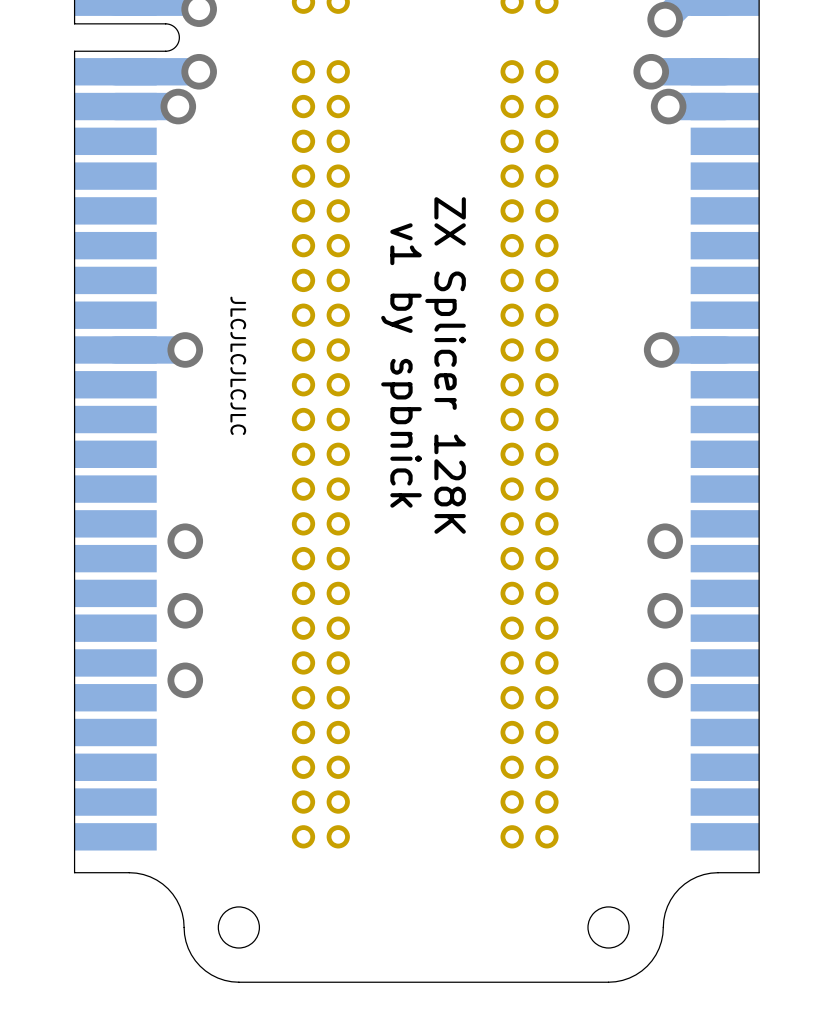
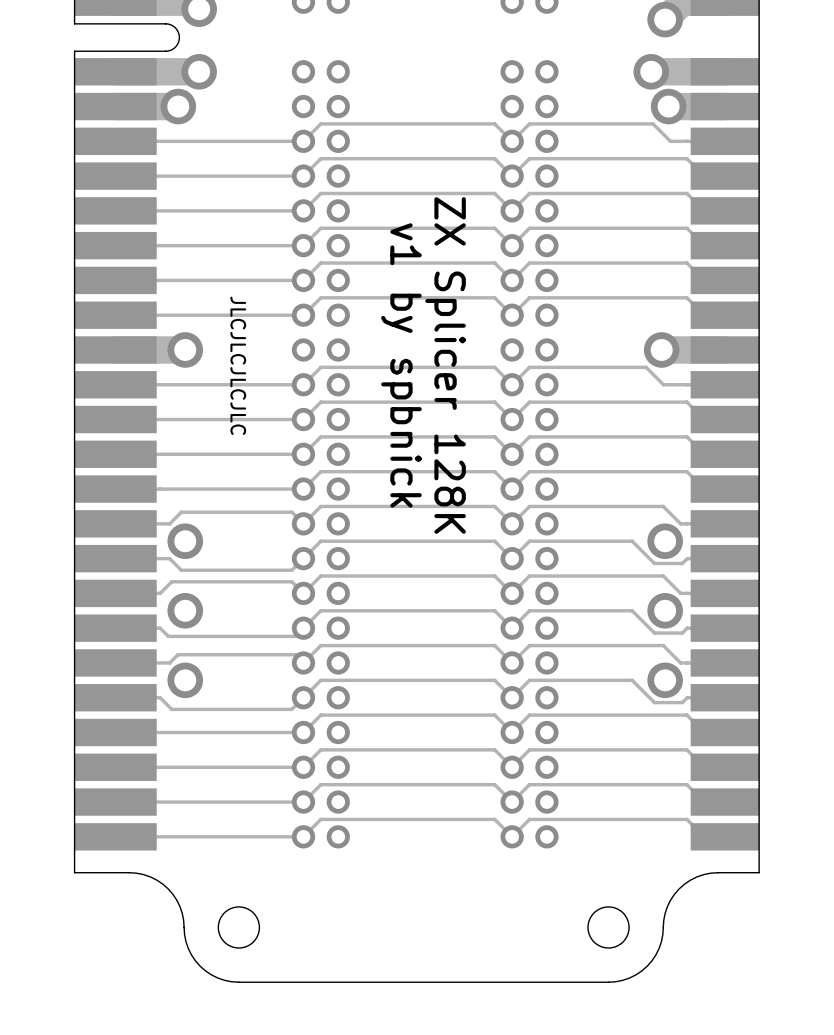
track: none -> (724, 141) (670, 141) (653, 123) (529, 123) (512, 141) (494, 123) (320, 123) (303, 141) (115, 141)
track: none -> (724, 176) (704, 176) (686, 158) (529, 158) (512, 176) (494, 158) (320, 158) (303, 176) (115, 176)
track: none -> (724, 210) (704, 210) (686, 193) (529, 193) (512, 210) (494, 193) (320, 193) (303, 210) (115, 210)
track: none -> (724, 245) (704, 245) (686, 228) (529, 228) (512, 245) (494, 228) (320, 228) (303, 245) (115, 245)
track: none -> (724, 280) (704, 280) (686, 263) (529, 263) (512, 280) (494, 263) (320, 263) (303, 280) (115, 280)
track: none -> (724, 315) (704, 315) (686, 297) (529, 297) (512, 315) (494, 297) (320, 297) (303, 315) (115, 315)
track: none -> (724, 384) (663, 384) (646, 367) (529, 367) (512, 384) (494, 367) (320, 367) (303, 384) (115, 384)
track: none -> (724, 419) (704, 419) (686, 402) (529, 402) (512, 419) (494, 402) (320, 402) (303, 419) (115, 419)
track: none -> (724, 454) (704, 454) (686, 436) (529, 436) (512, 454) (494, 436) (320, 436) (303, 454) (115, 454)
track: none -> (724, 489) (704, 489) (686, 471) (529, 471) (512, 489) (494, 471) (320, 471) (303, 489) (115, 489)
track: none -> (724, 523) (680, 523) (663, 506) (529, 506) (512, 523) (494, 506) (320, 506) (303, 523) (291, 512) (181, 512) (169, 523) (115, 523)
track: none -> (724, 558) (687, 558) (682, 563) (654, 563) (632, 541) (529, 541) (512, 558) (494, 541) (320, 541) (291, 570) (181, 570) (169, 558) (115, 558)
track: none -> (724, 593) (680, 593) (663, 576) (529, 576) (512, 593) (494, 576) (320, 576) (303, 593) (291, 581) (171, 581) (160, 593) (115, 593)
track: none -> (724, 628) (687, 628) (682, 633) (654, 633) (632, 610) (529, 610) (512, 628) (494, 610) (320, 610) (295, 636) (168, 636) (160, 628) (115, 628)
track: none -> (724, 662) (680, 662) (663, 645) (529, 645) (512, 662) (494, 645) (320, 645) (303, 662) (295, 654) (177, 654) (169, 662) (115, 662)
track: none -> (724, 697) (687, 697) (682, 702) (654, 702) (632, 680) (529, 680) (512, 697) (494, 680) (320, 680) (291, 709) (171, 709) (160, 697) (115, 697)
track: none -> (724, 732) (704, 732) (686, 715) (529, 715) (512, 732) (494, 715) (320, 715) (303, 732) (115, 732)
track: none -> (724, 767) (704, 767) (686, 749) (529, 749) (512, 767) (494, 749) (320, 749) (303, 767) (115, 767)
track: none -> (724, 802) (704, 802) (686, 784) (529, 784) (512, 802) (494, 784) (320, 784) (303, 802) (115, 802)
track: none -> (724, 836) (704, 836) (686, 819) (529, 819) (512, 836) (494, 819) (320, 819) (303, 836) (115, 836)

